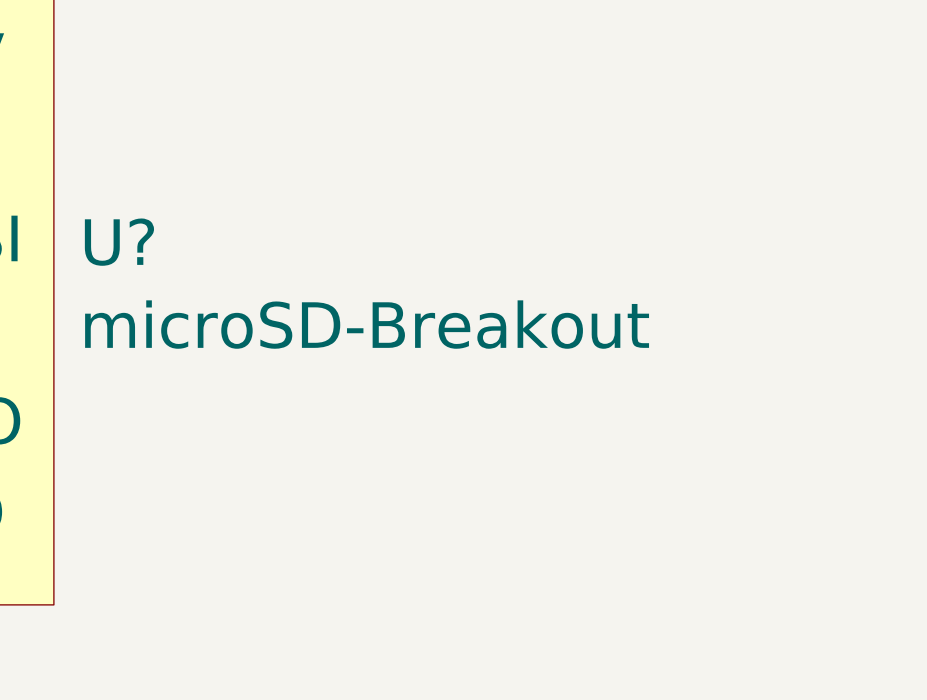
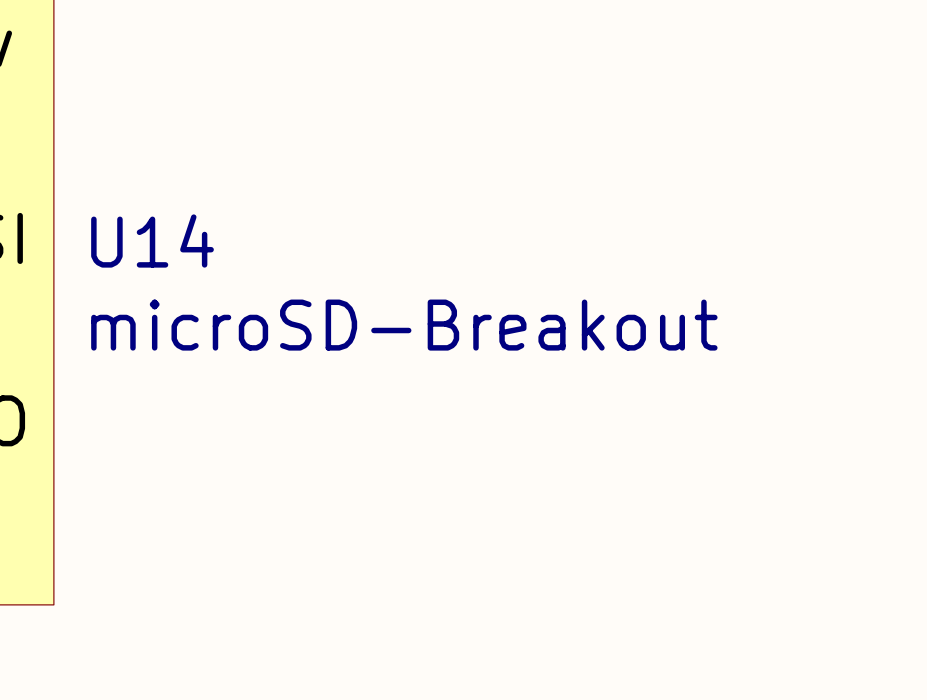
U? name: U? (119, 242) -> U14 (152, 241)

